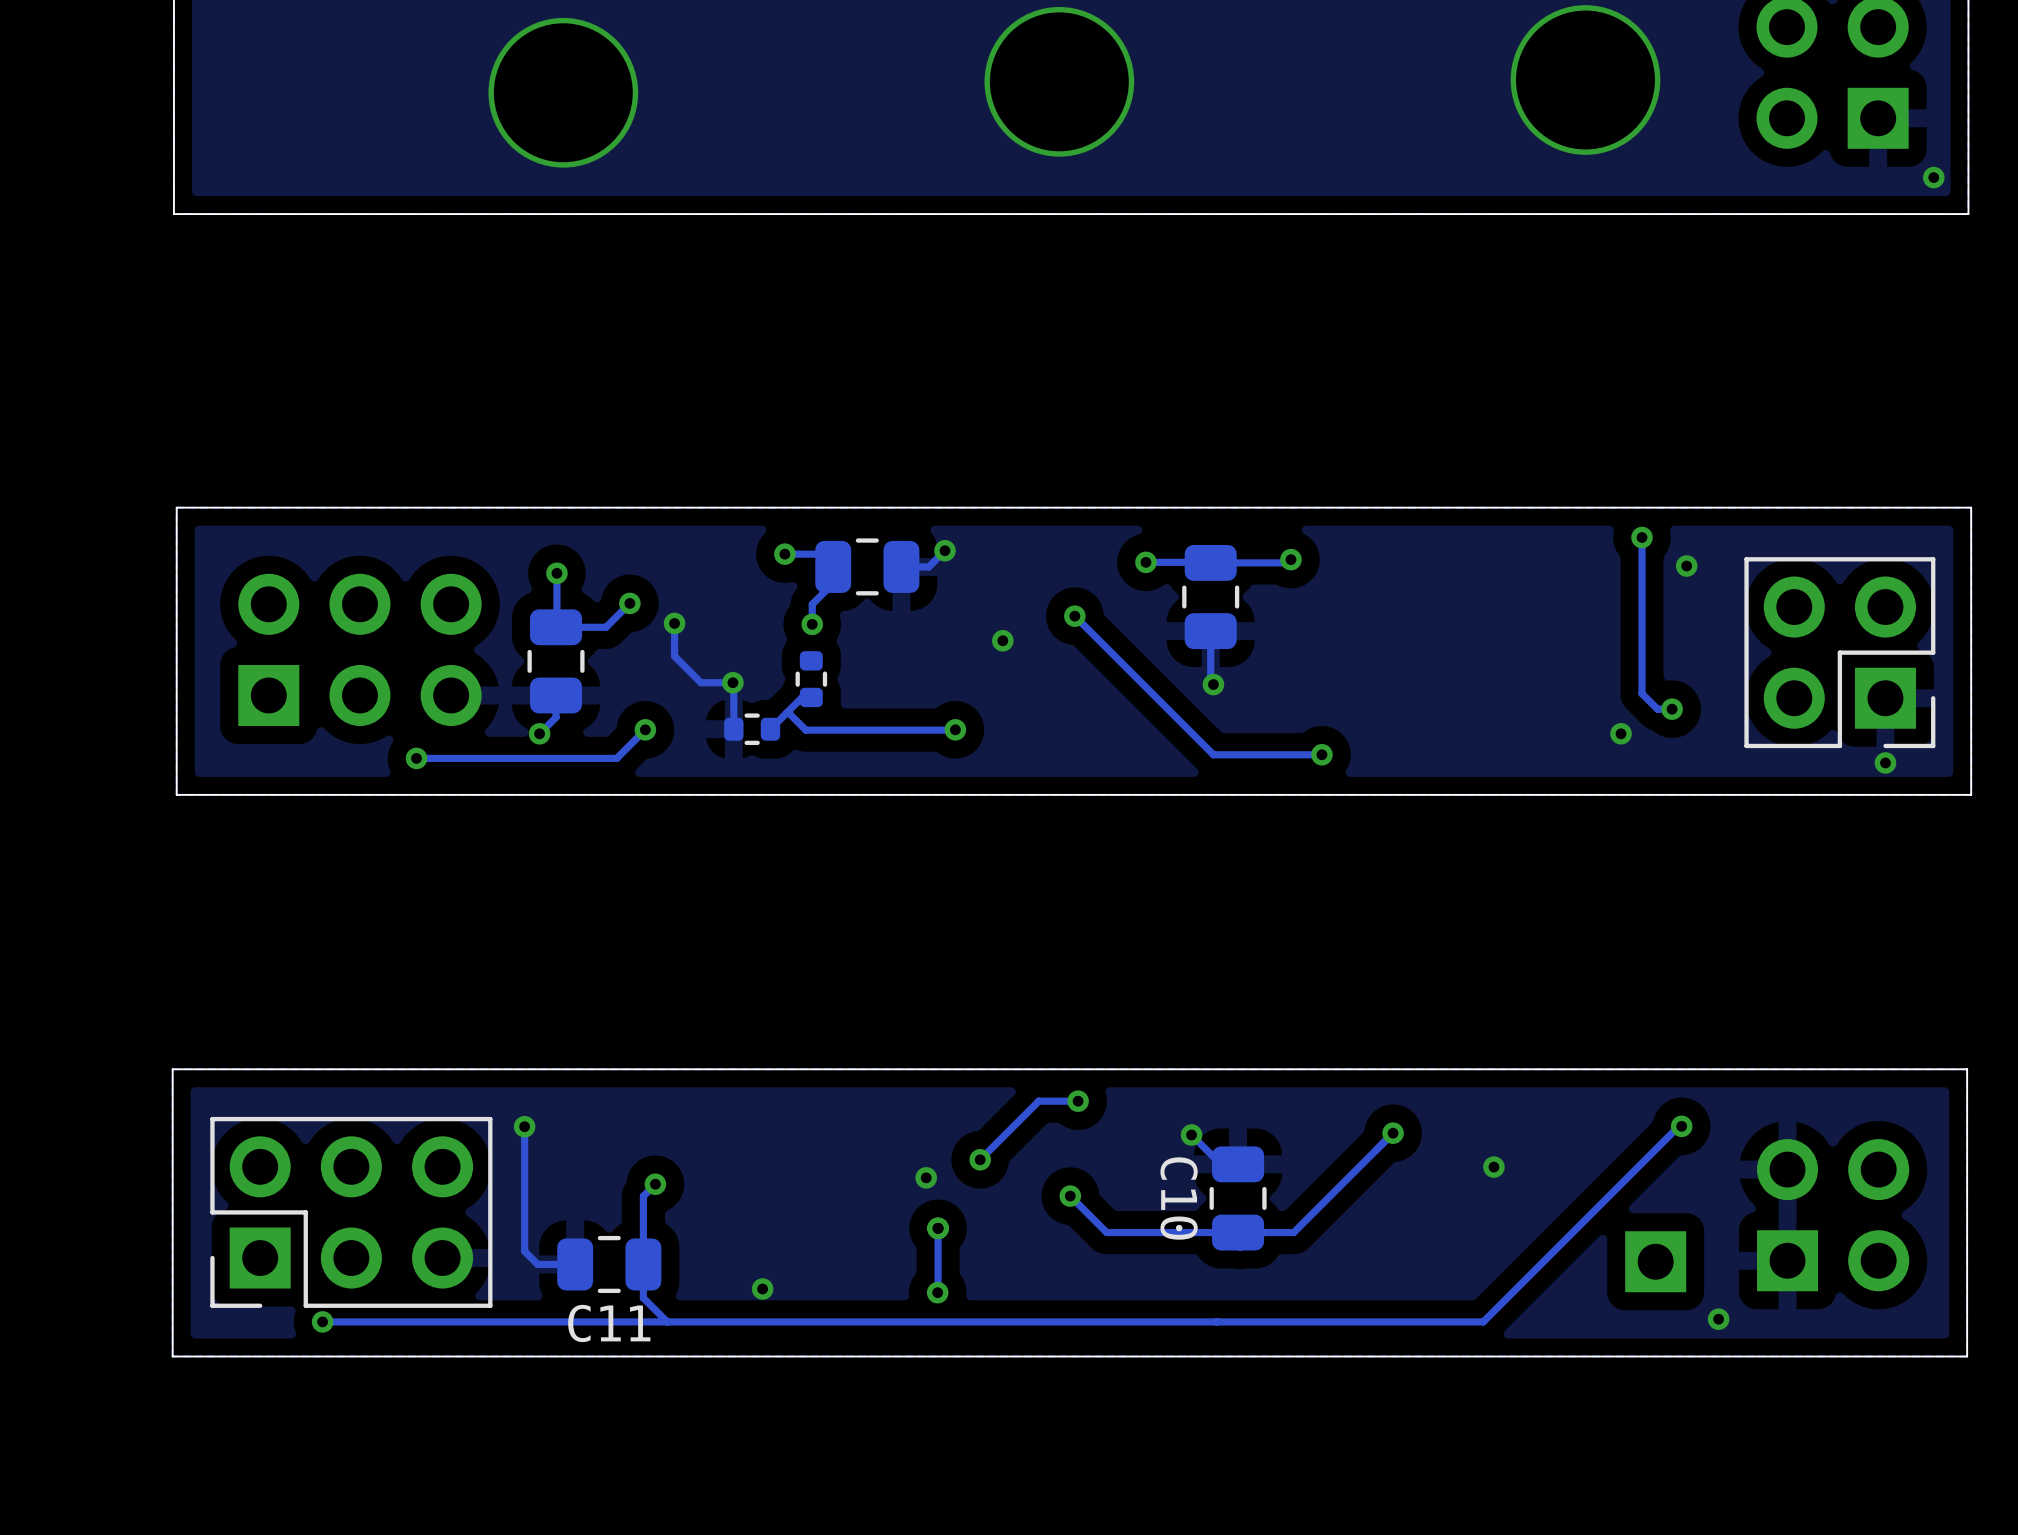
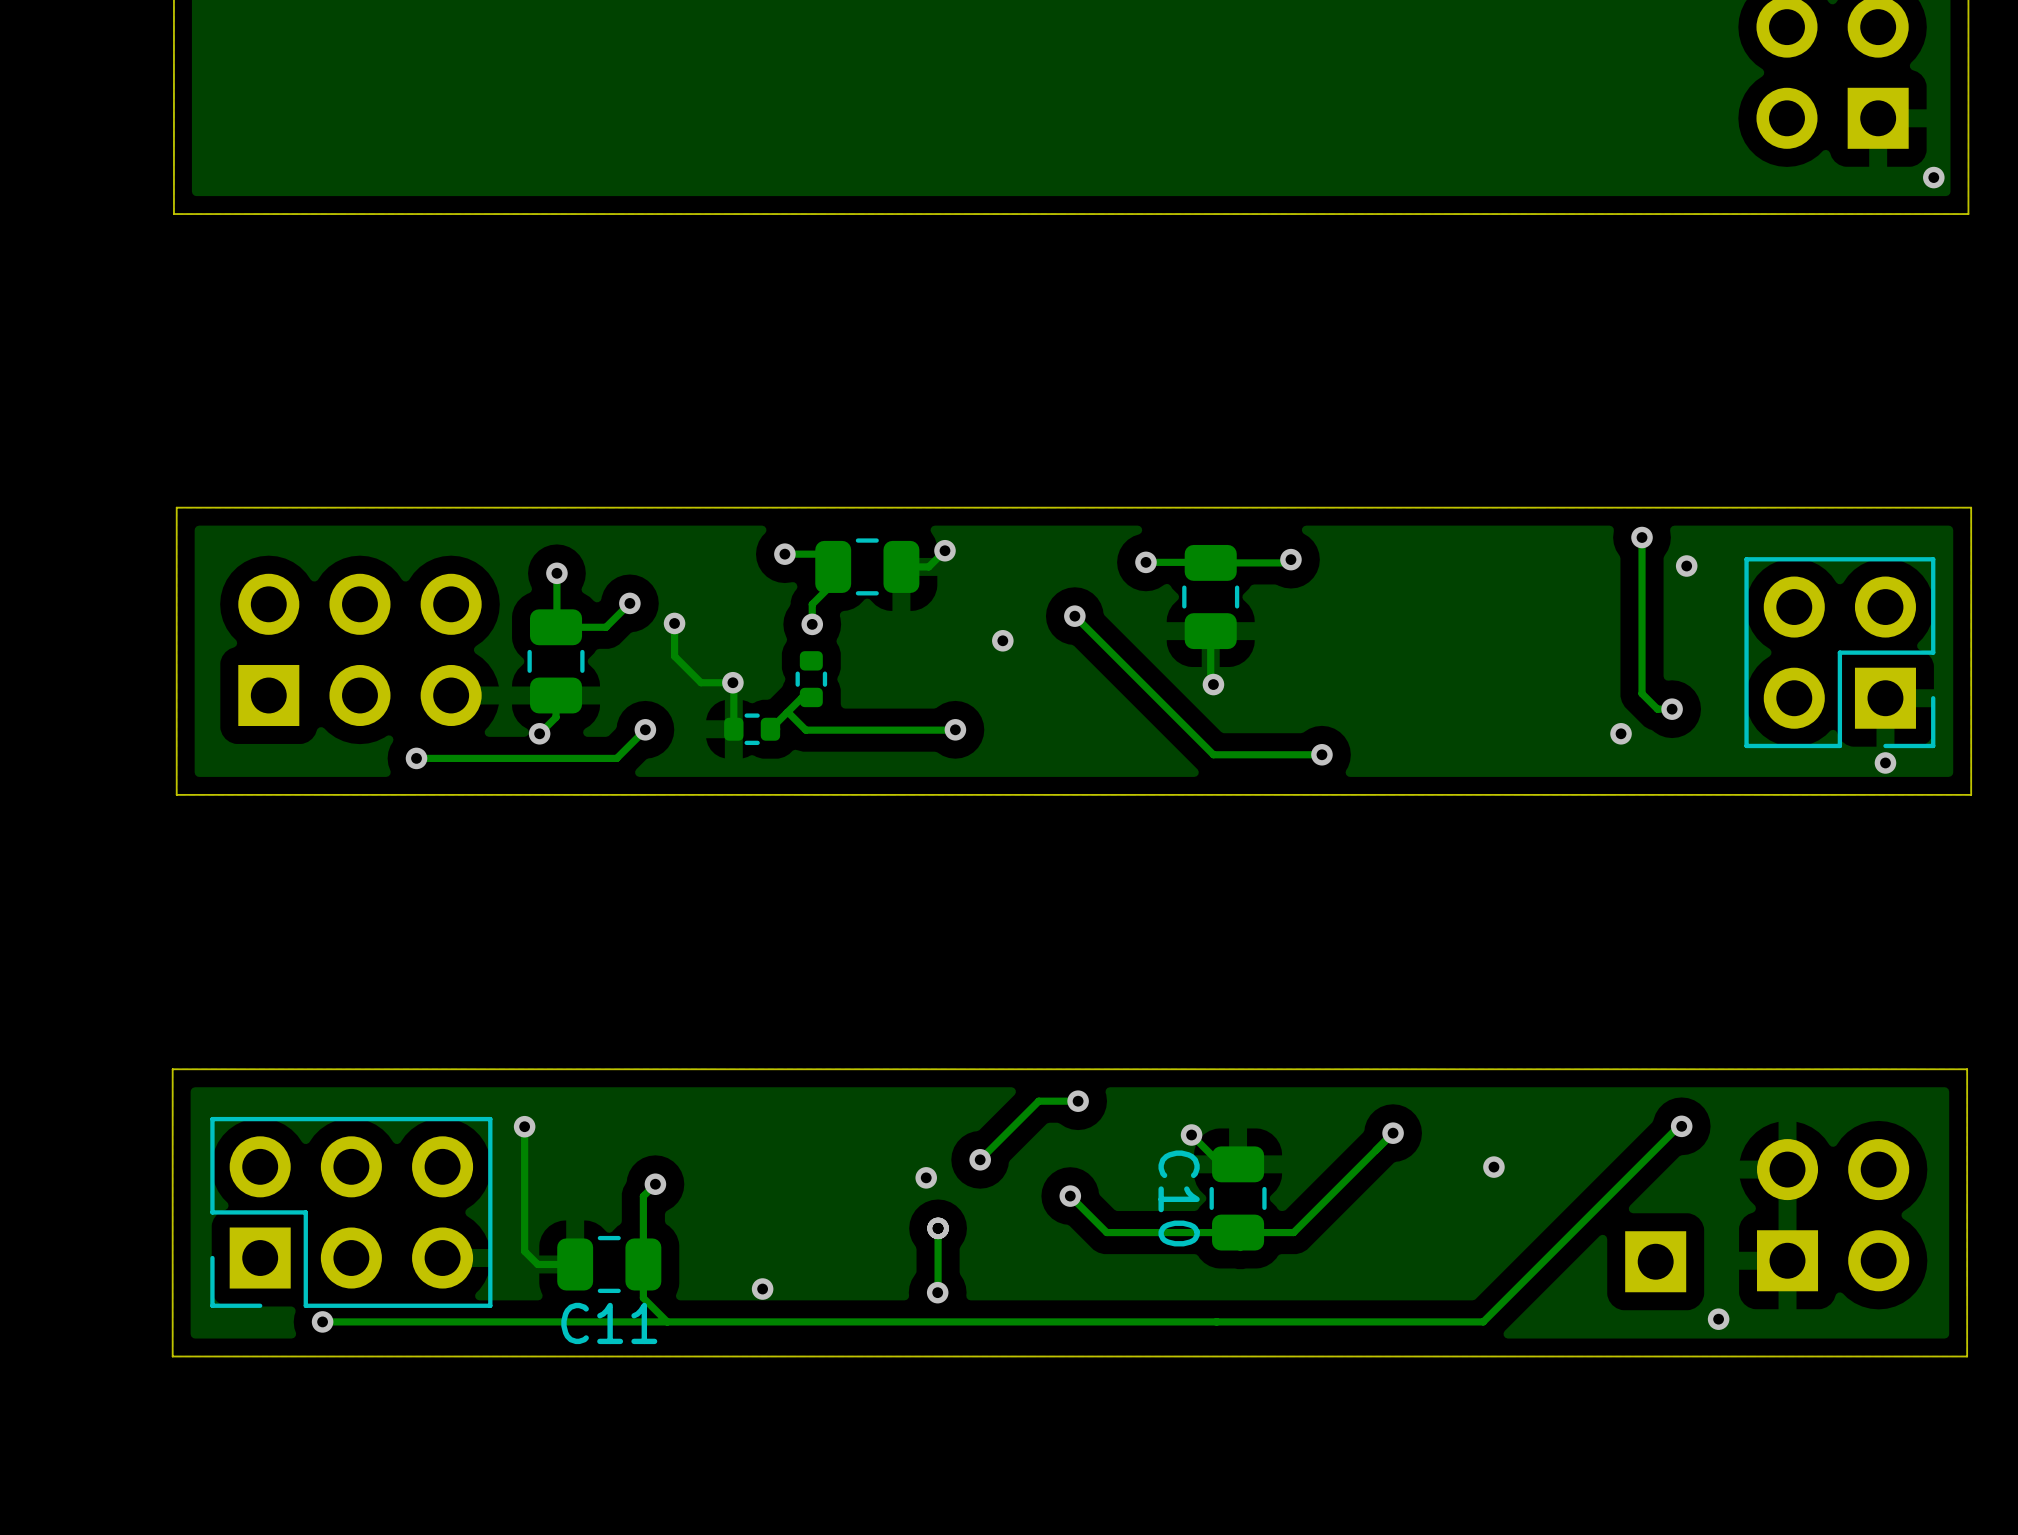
via: (1585, 80) -> none
via: (1059, 81) -> none
via: (563, 92) -> none

